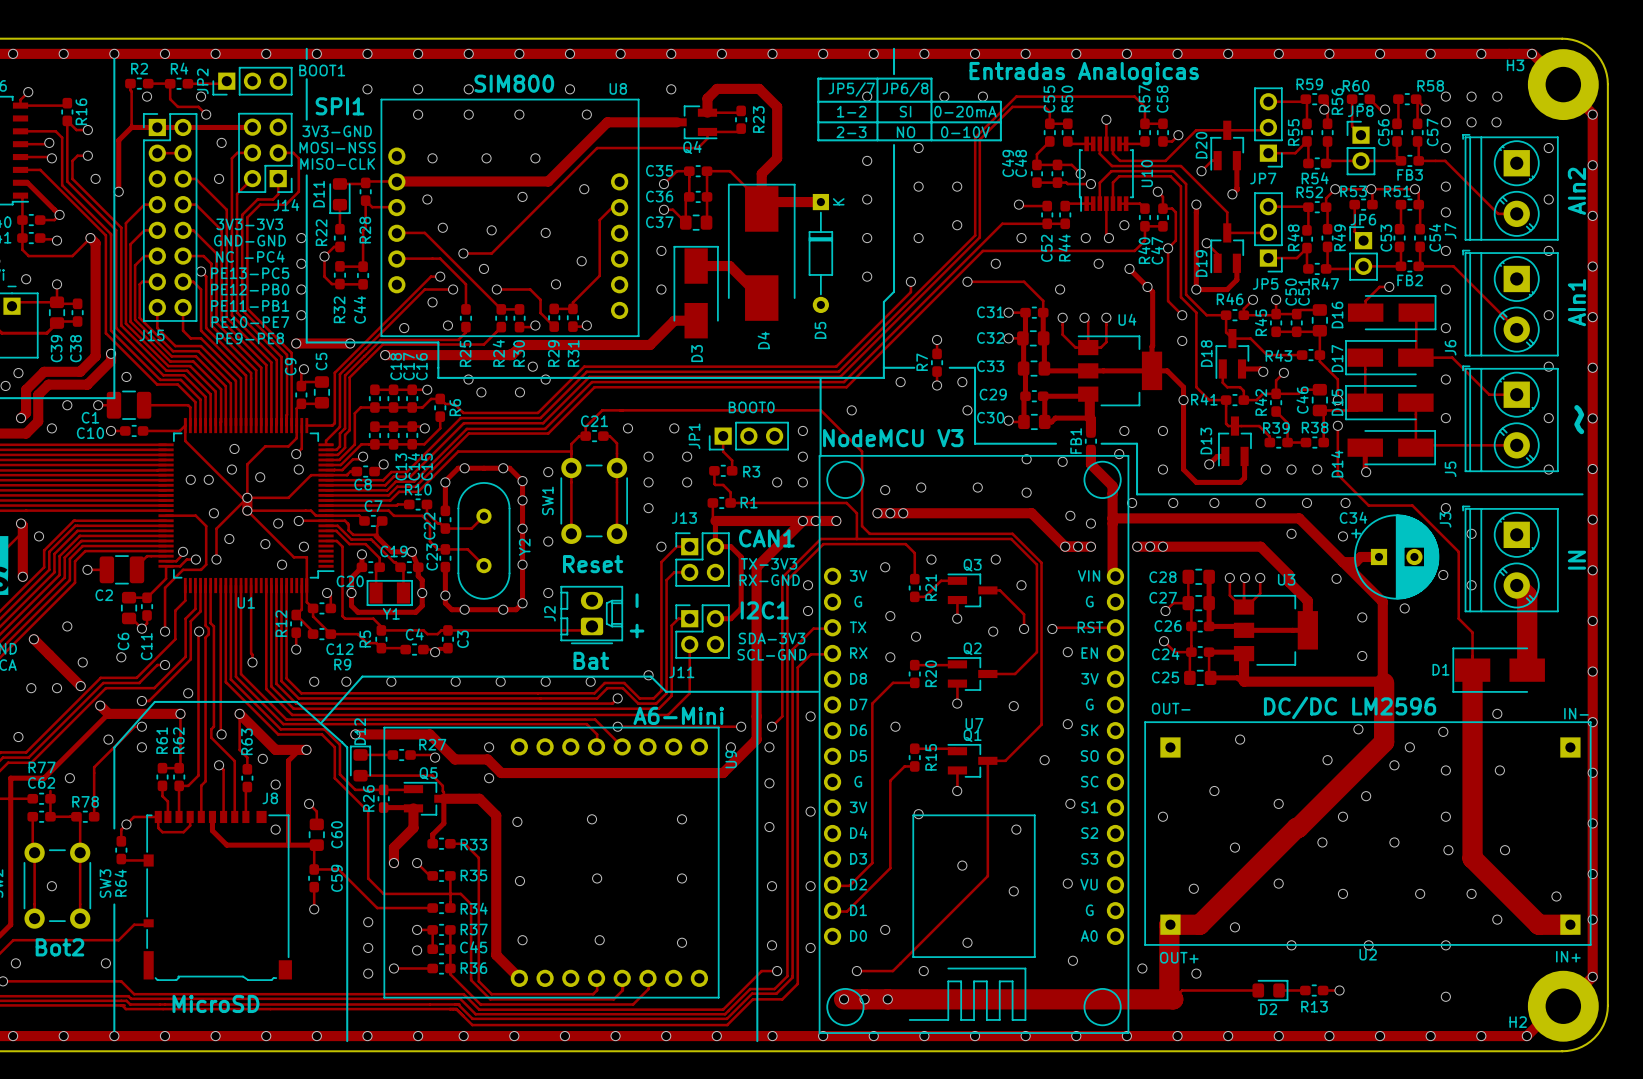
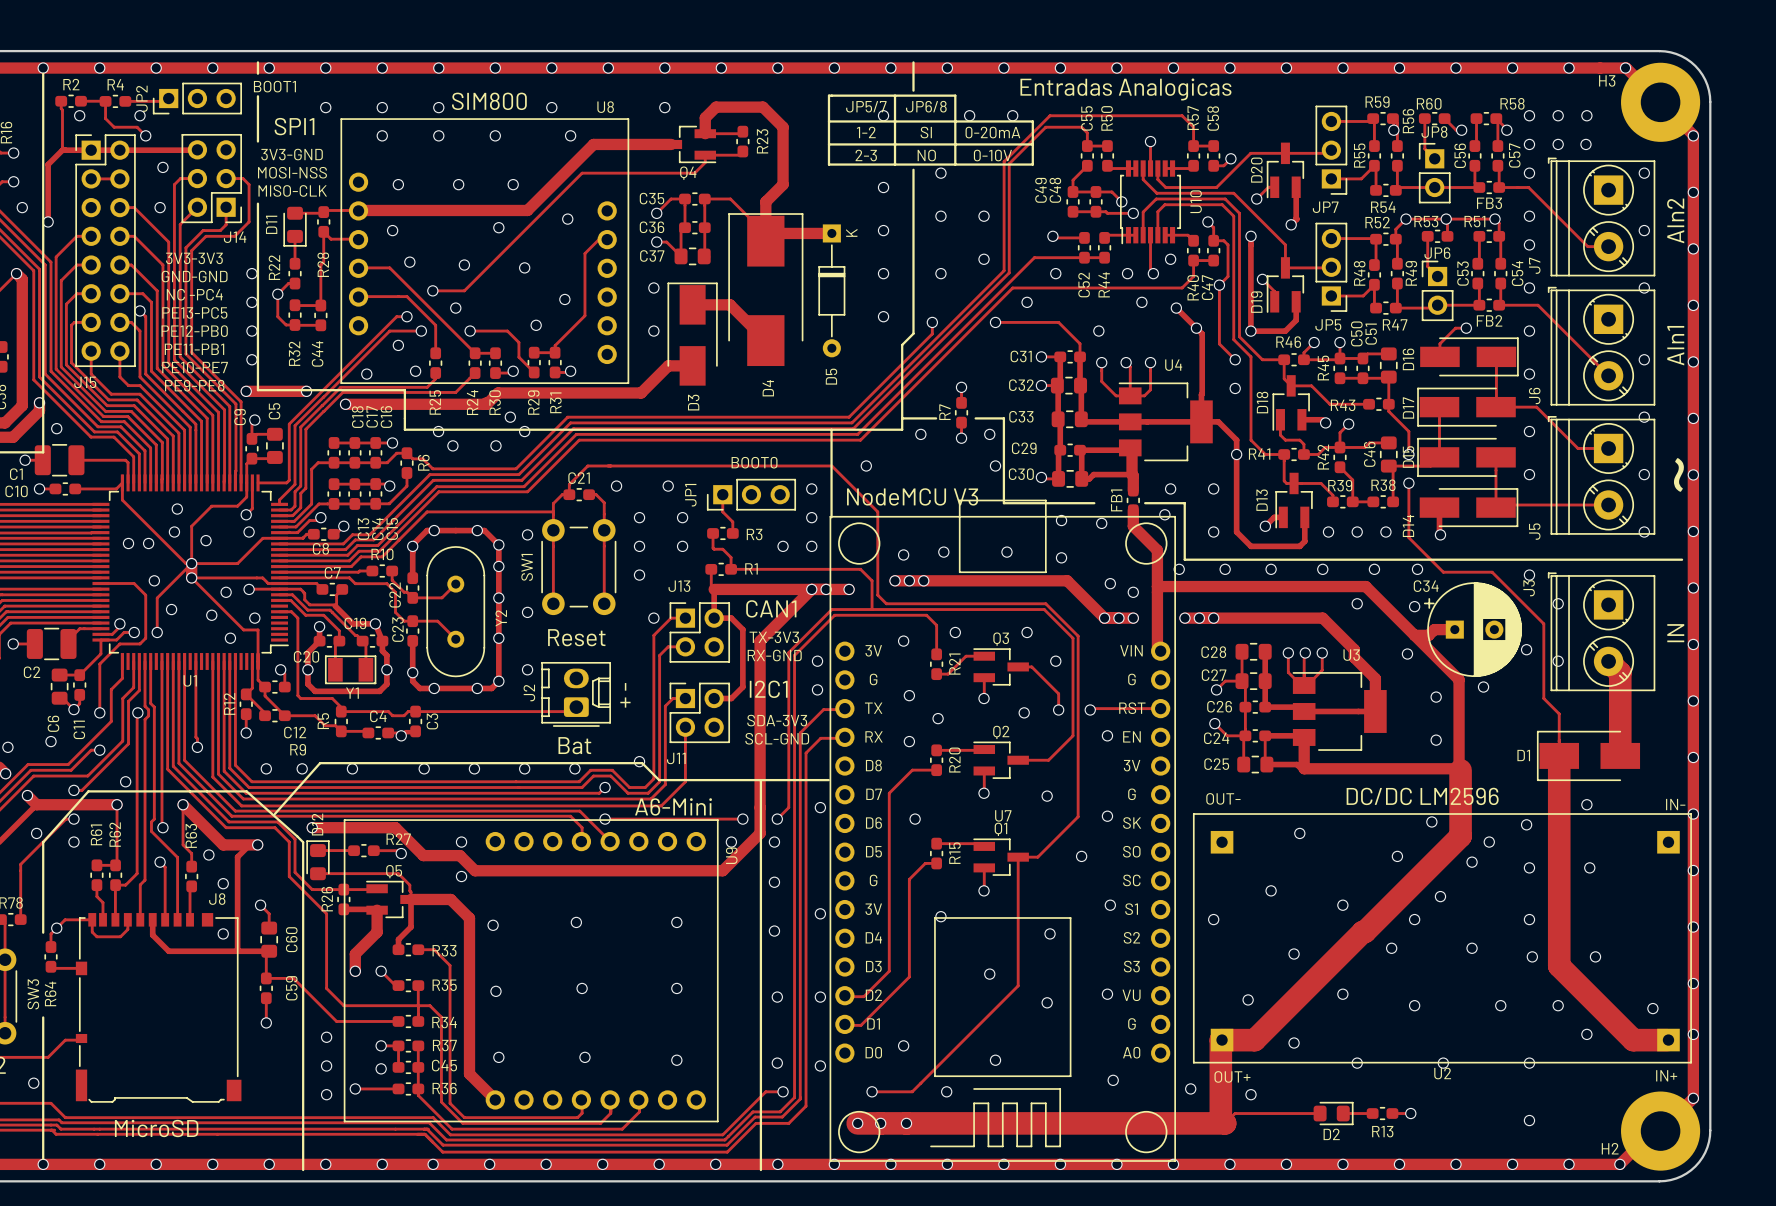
U7 footprint: [818, 455, 1130, 1034] -> [829, 499, 1176, 1162]

